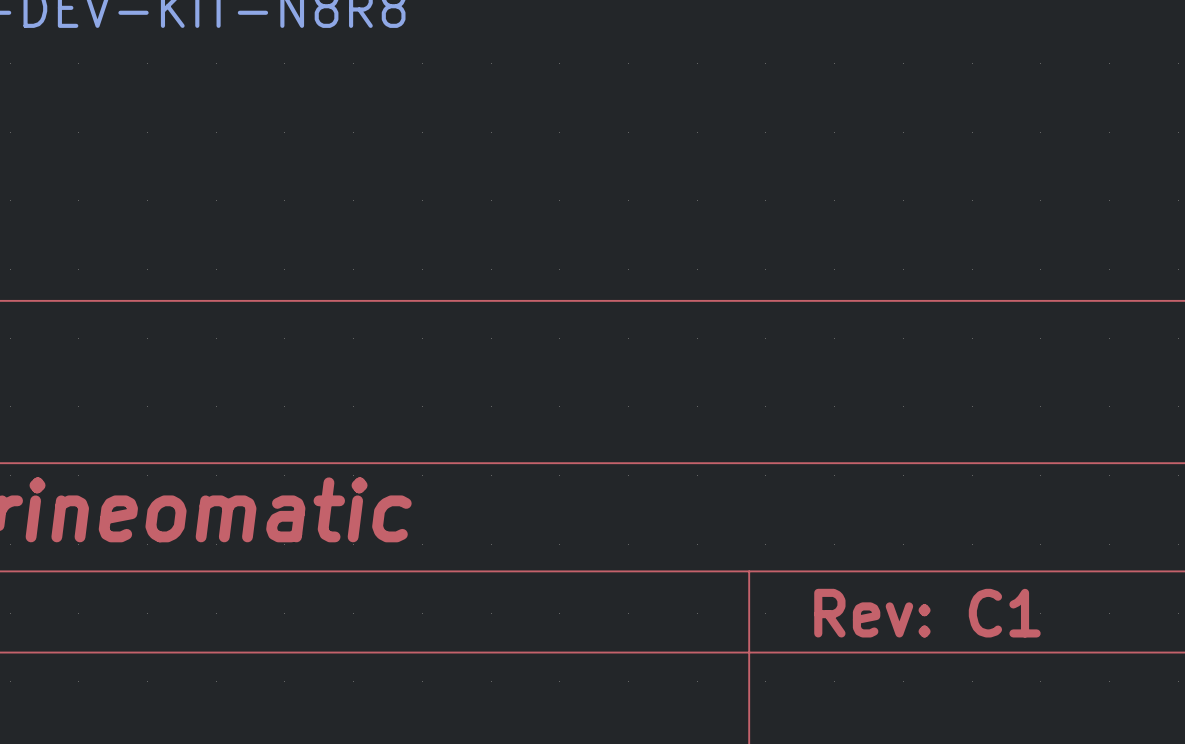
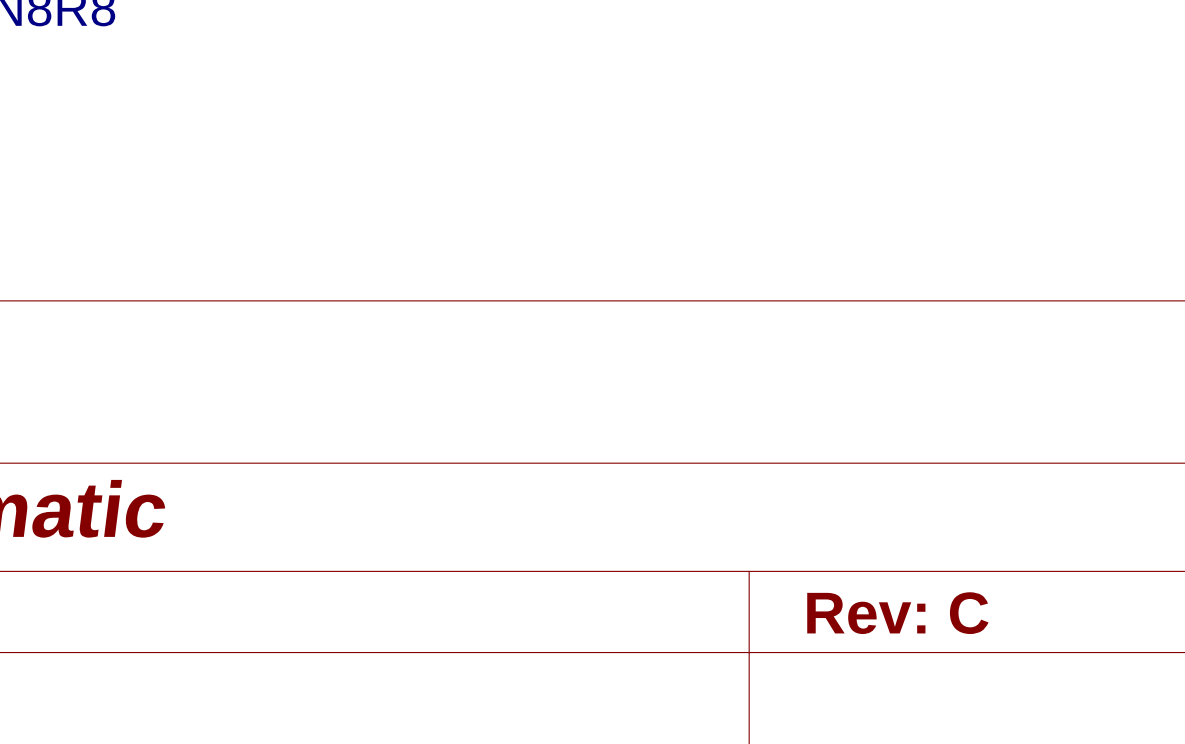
title block: Rev: C1 (927, 613) -> Rev: C (897, 613)

